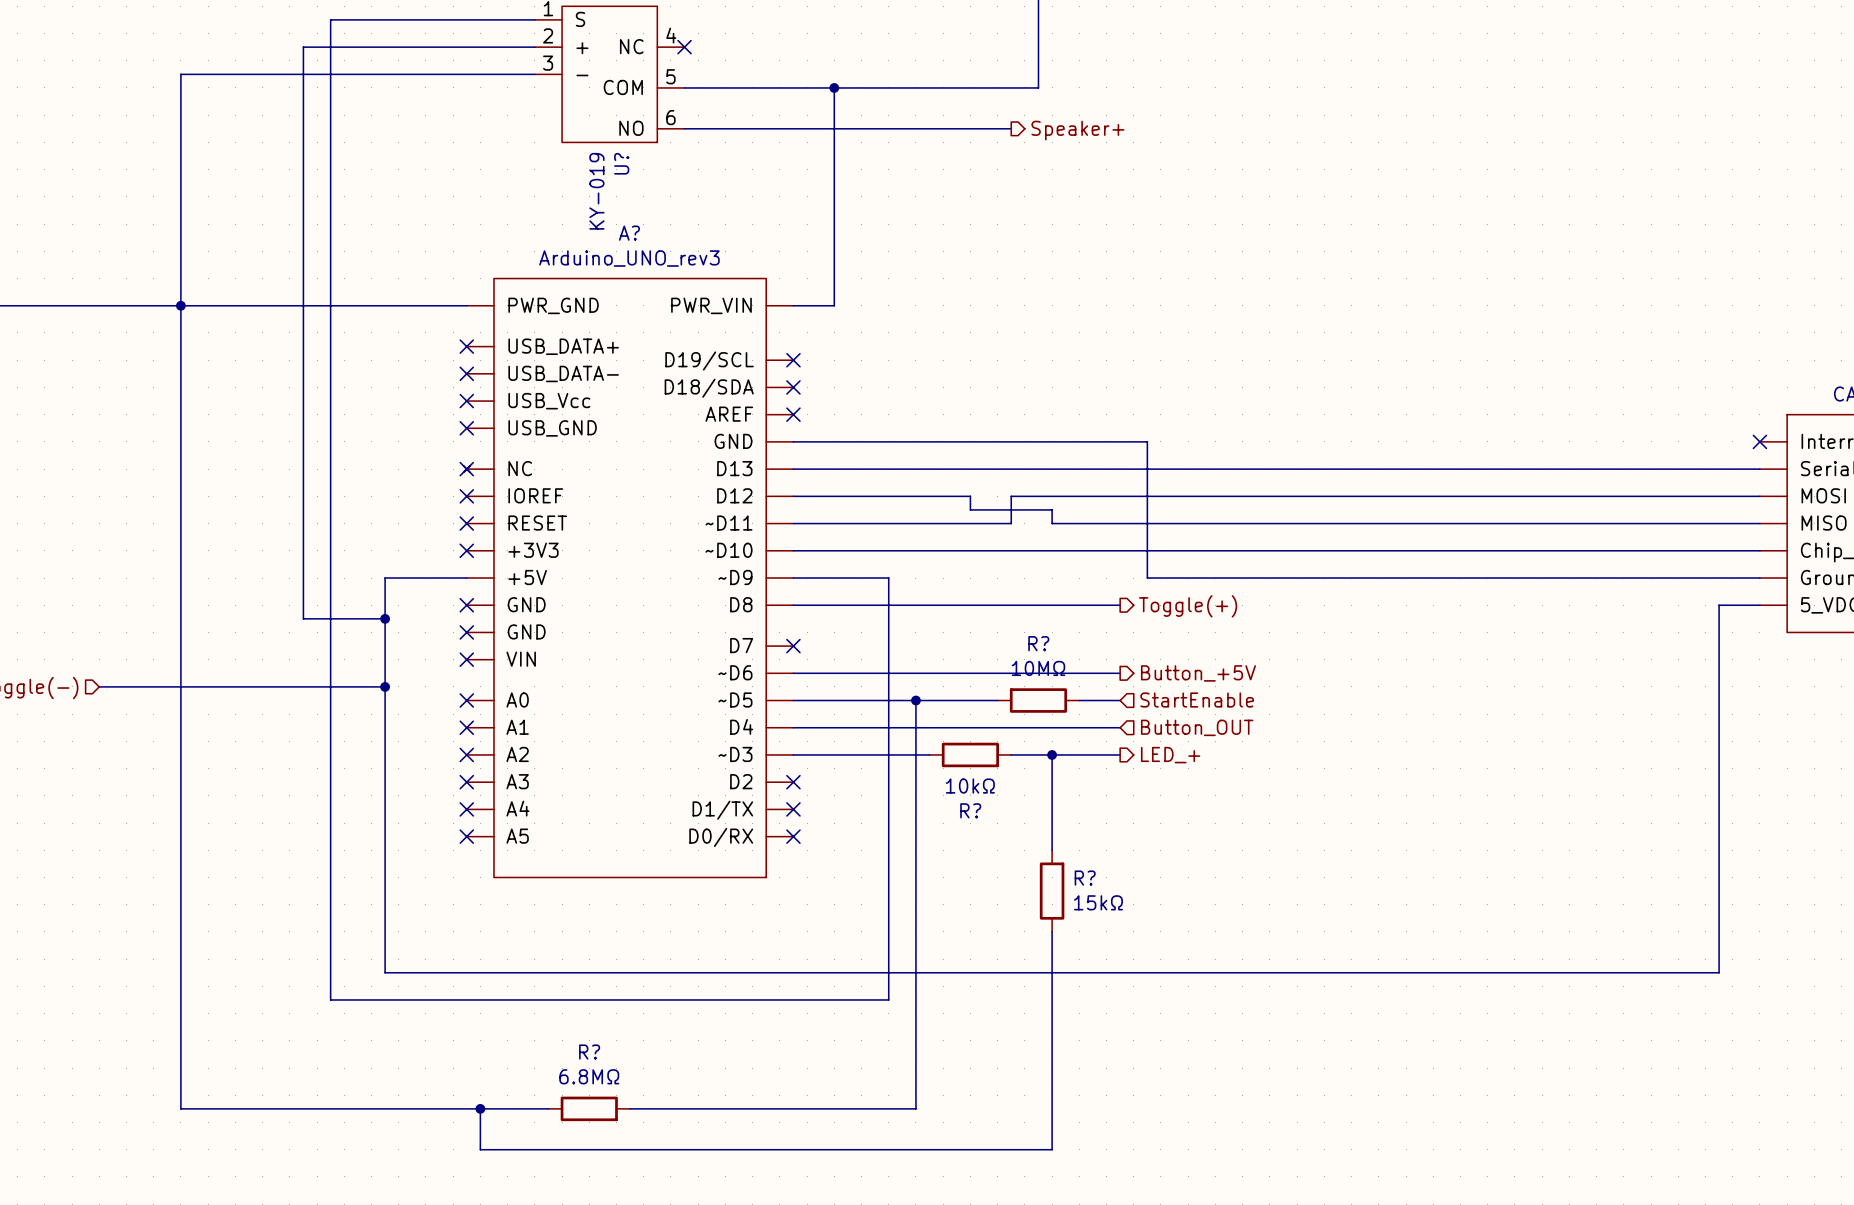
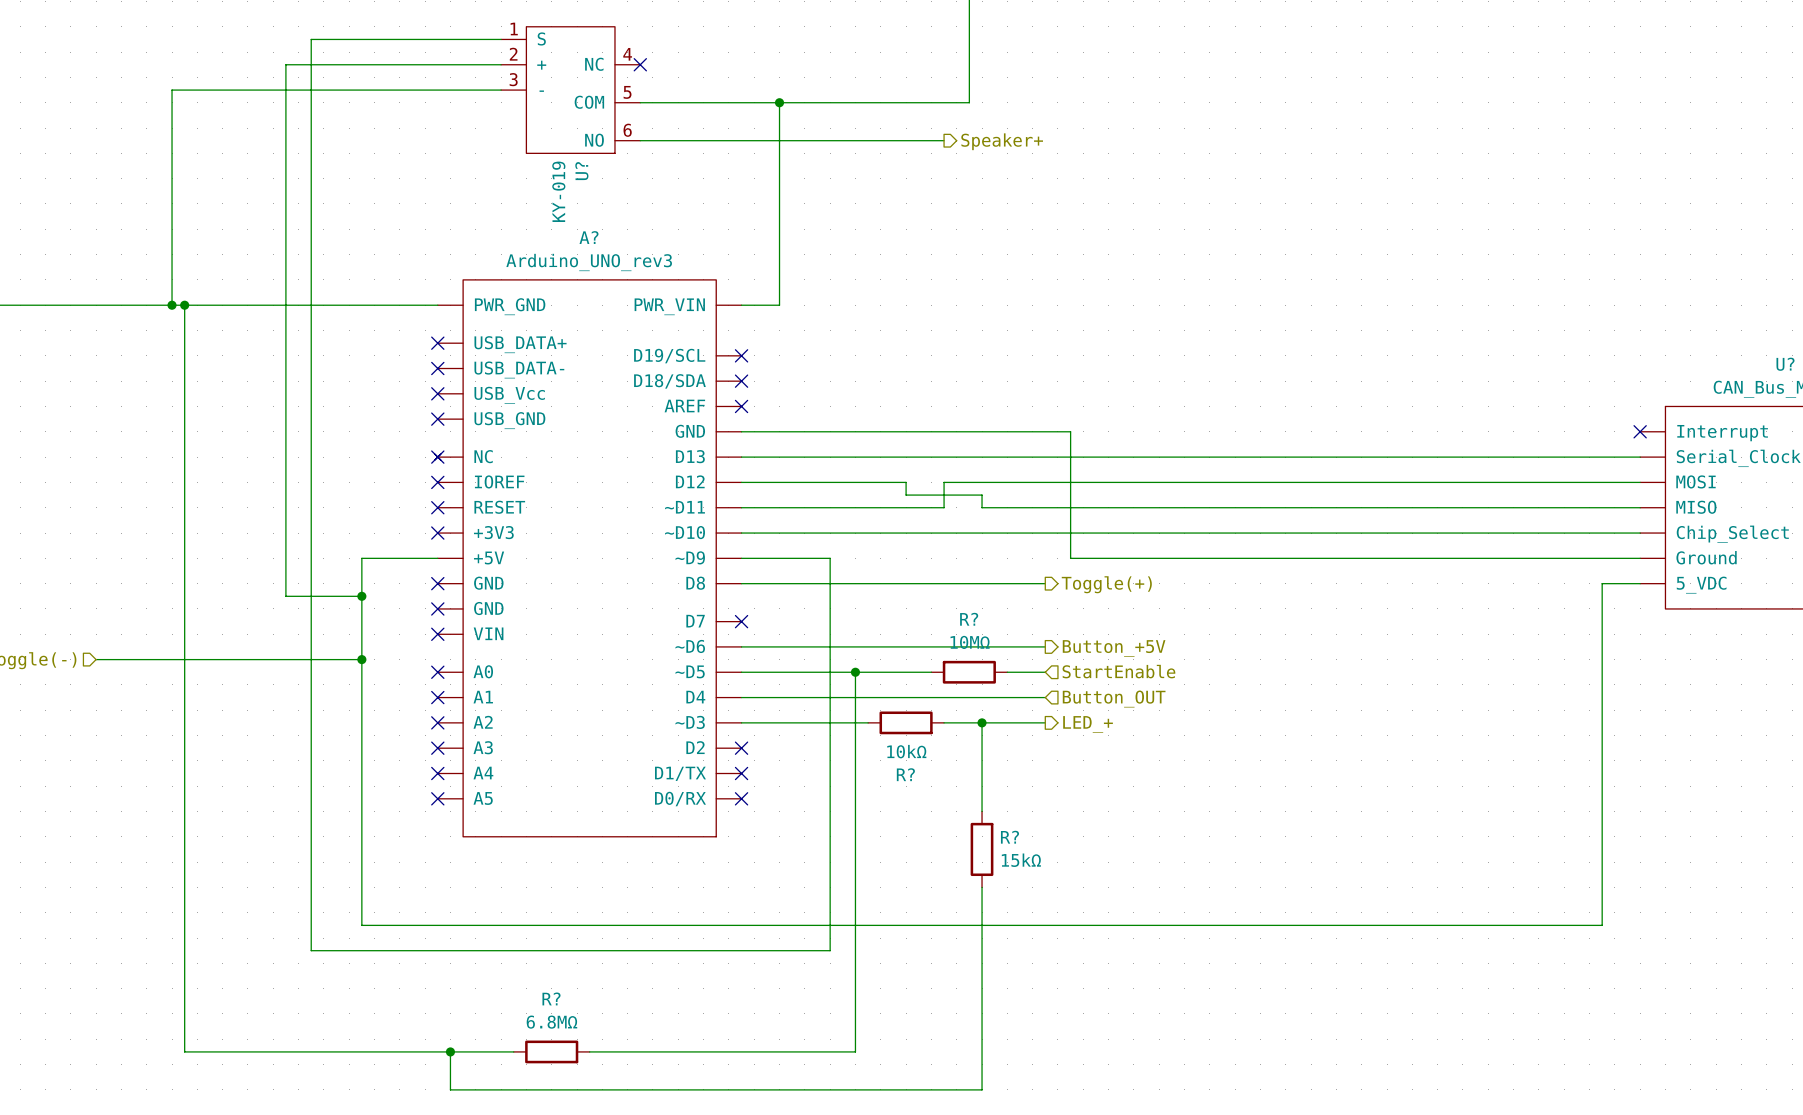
wire: (180, 305) (180, 1108) (194, 1108) -> (184, 305) (184, 1051)
junction: none -> (184, 305)

